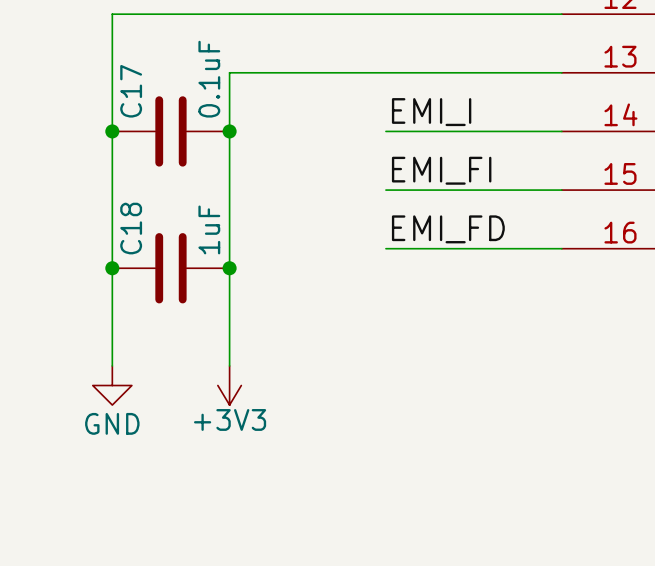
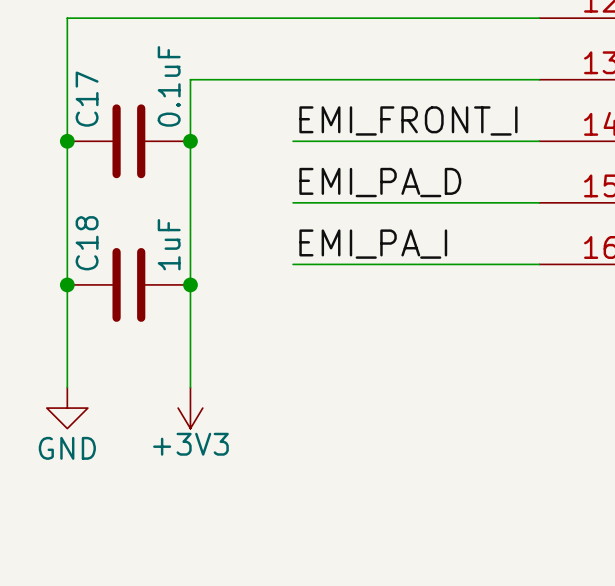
label: EMI_I (431, 112) -> EMI_FRONT_I (408, 120)
wire: none -> (293, 141) (354, 141)
label: none -> EMI_PA_D (380, 182)
label: EMI_FI (441, 170) -> none
wire: none -> (293, 202) (354, 202)
label: none -> EMI_PA_I (373, 244)
label: EMI_FD (448, 229) -> none
wire: none -> (293, 264) (354, 264)

